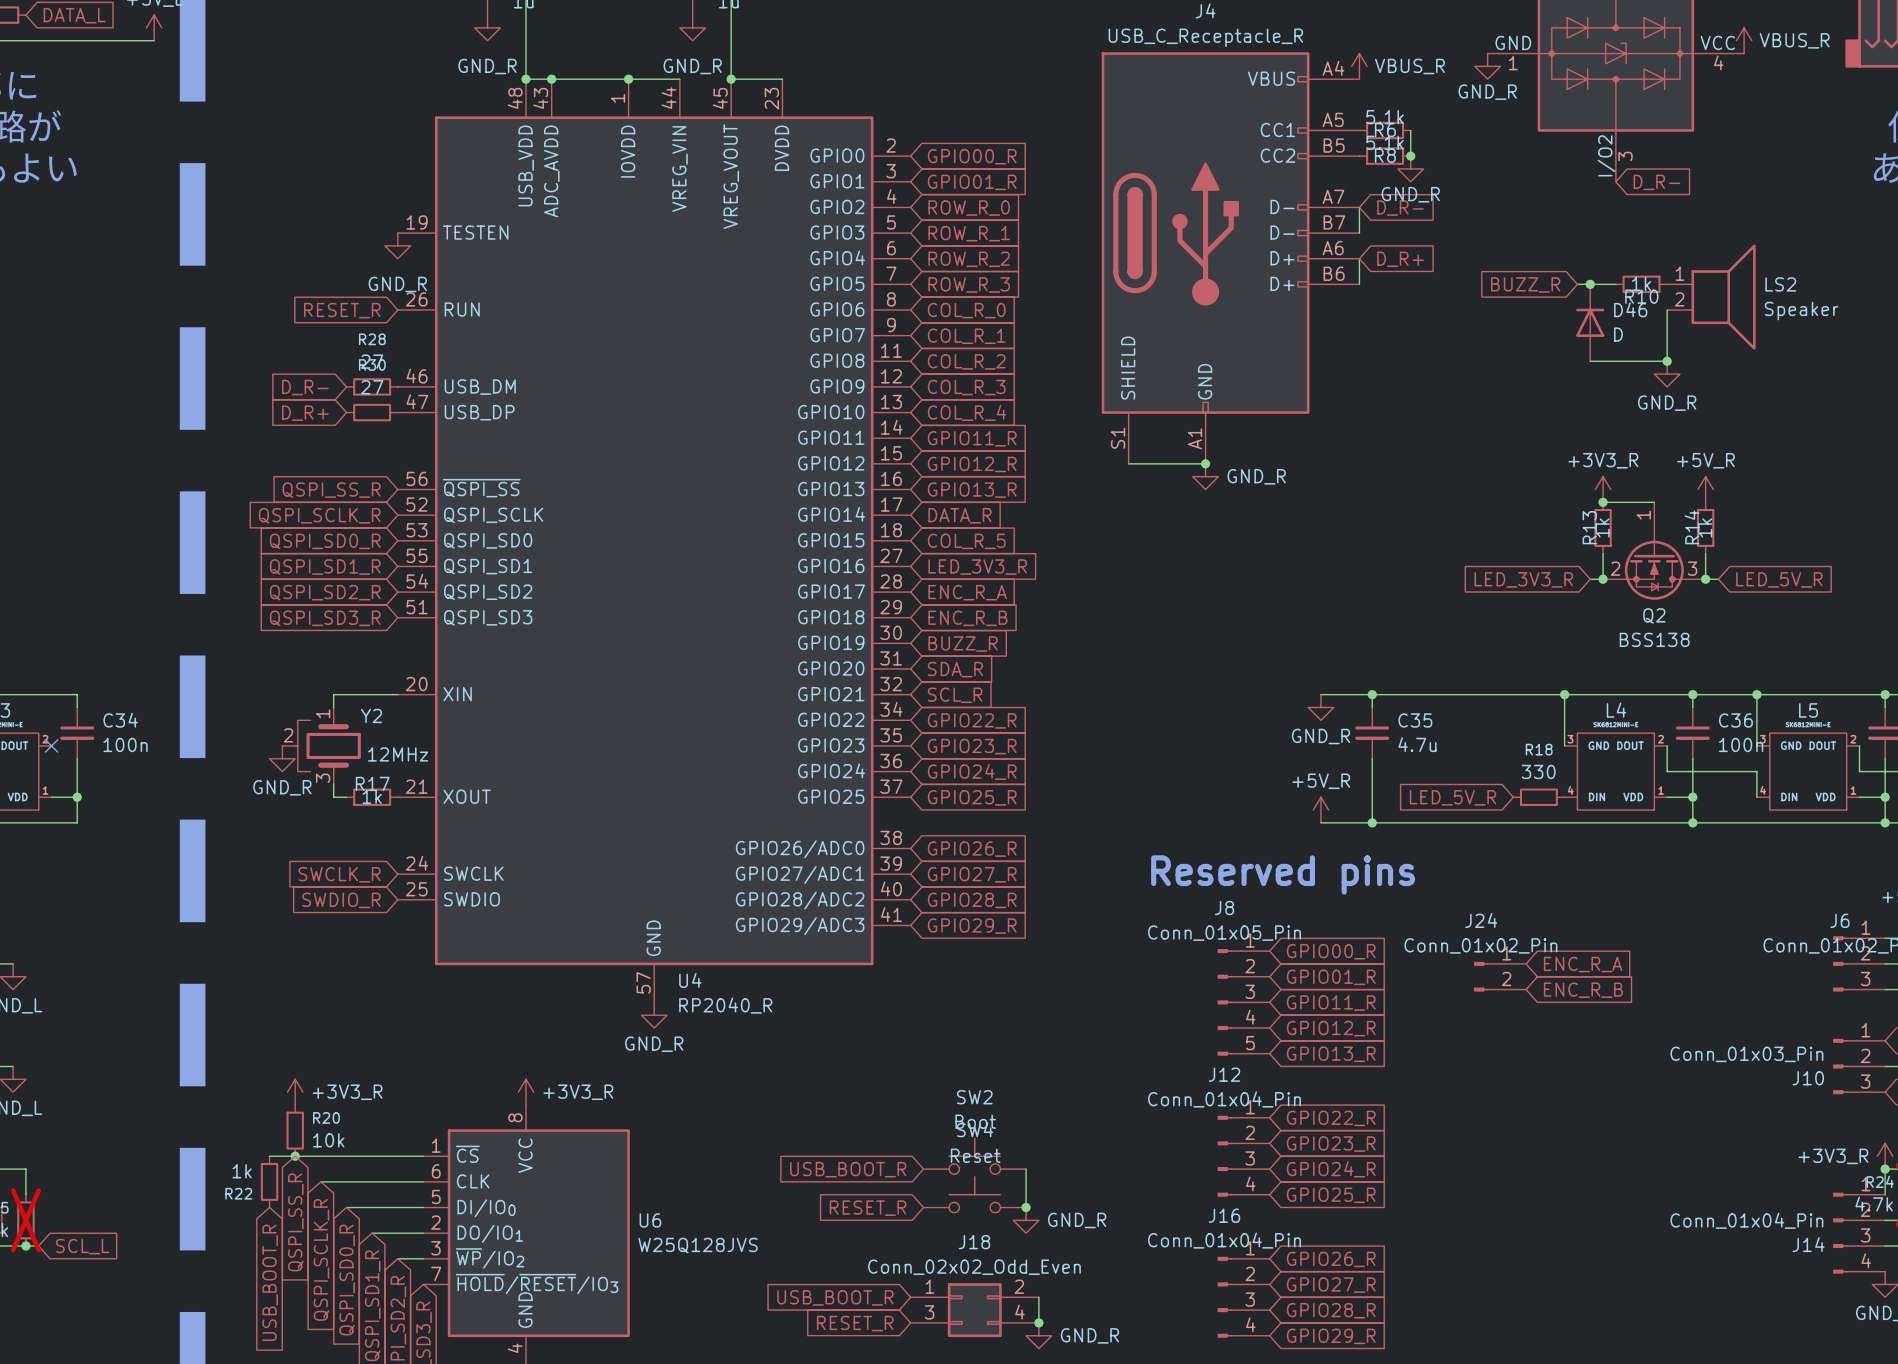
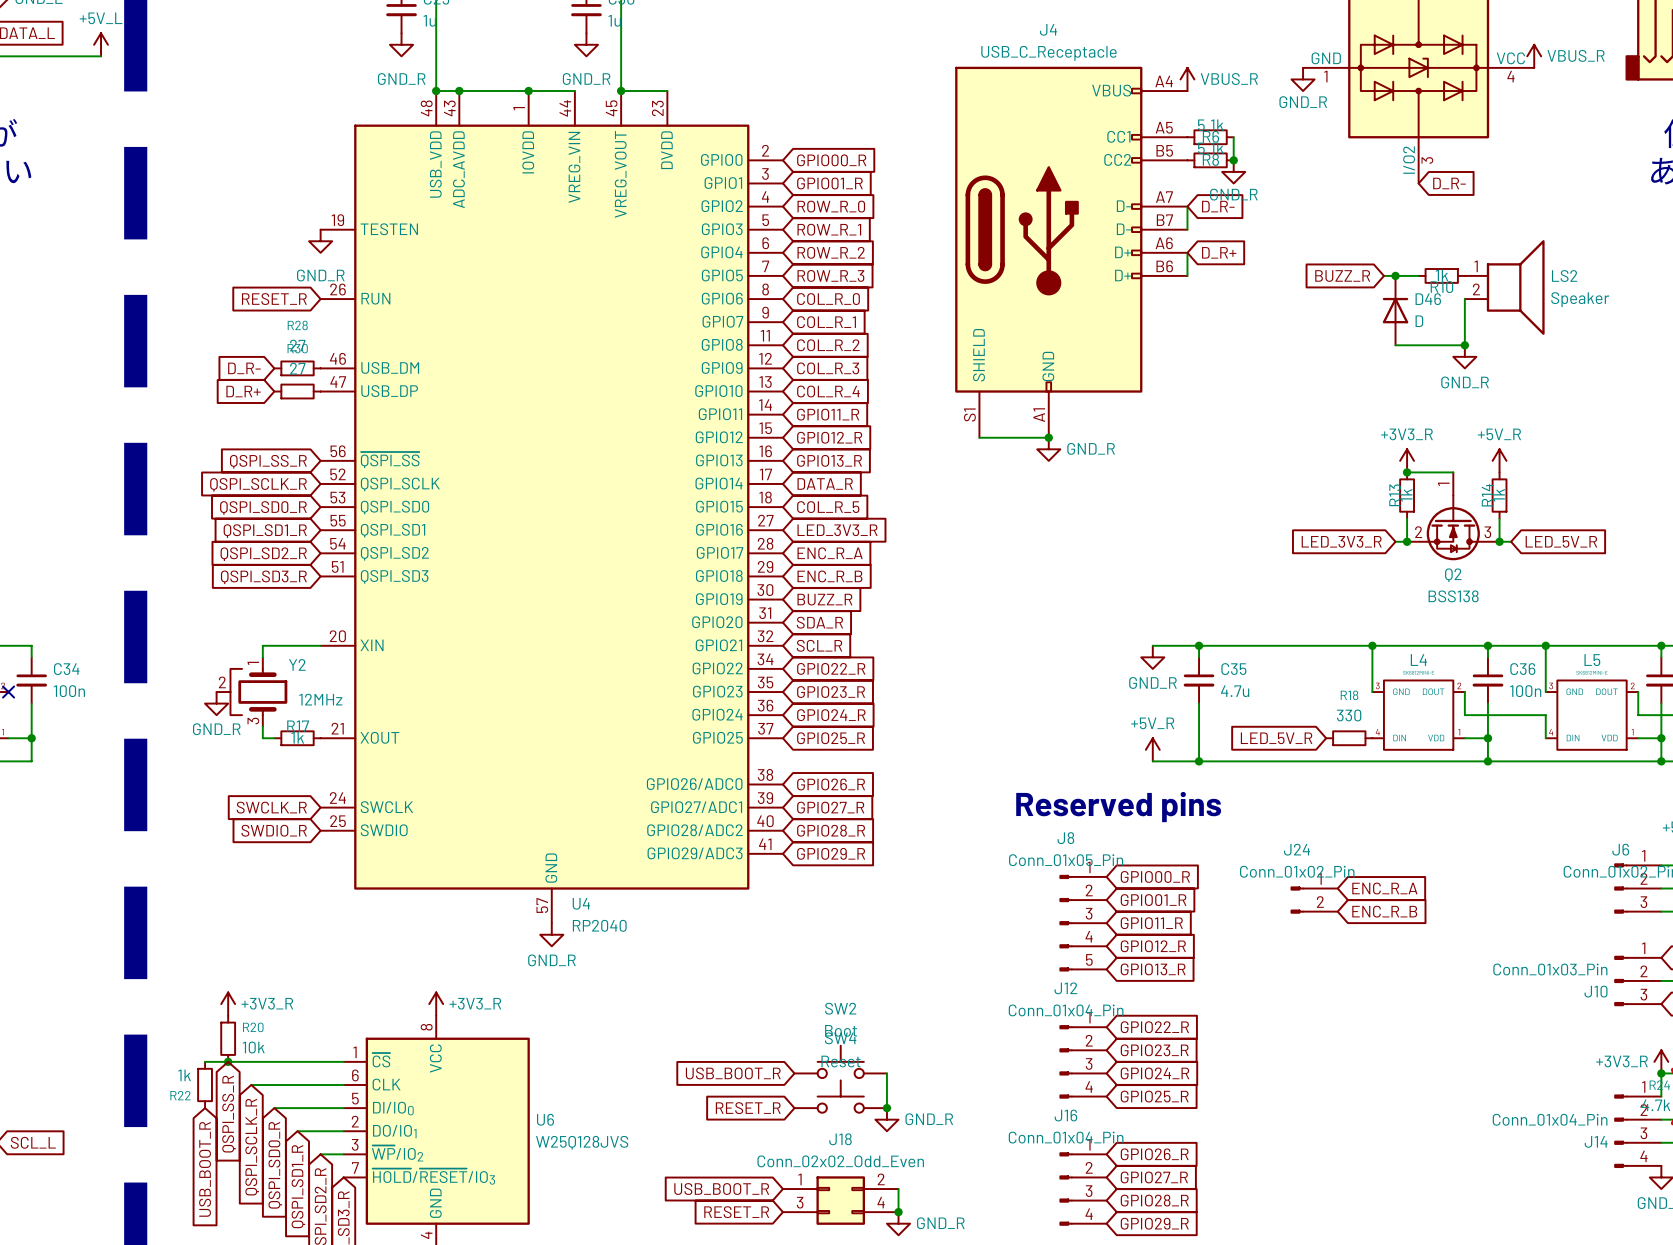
J4 value: USB_C_Receptacle_R (1205, 37) -> USB_C_Receptacle (1048, 53)
U4 value: RP2040_R (725, 1005) -> RP2040 (599, 925)

